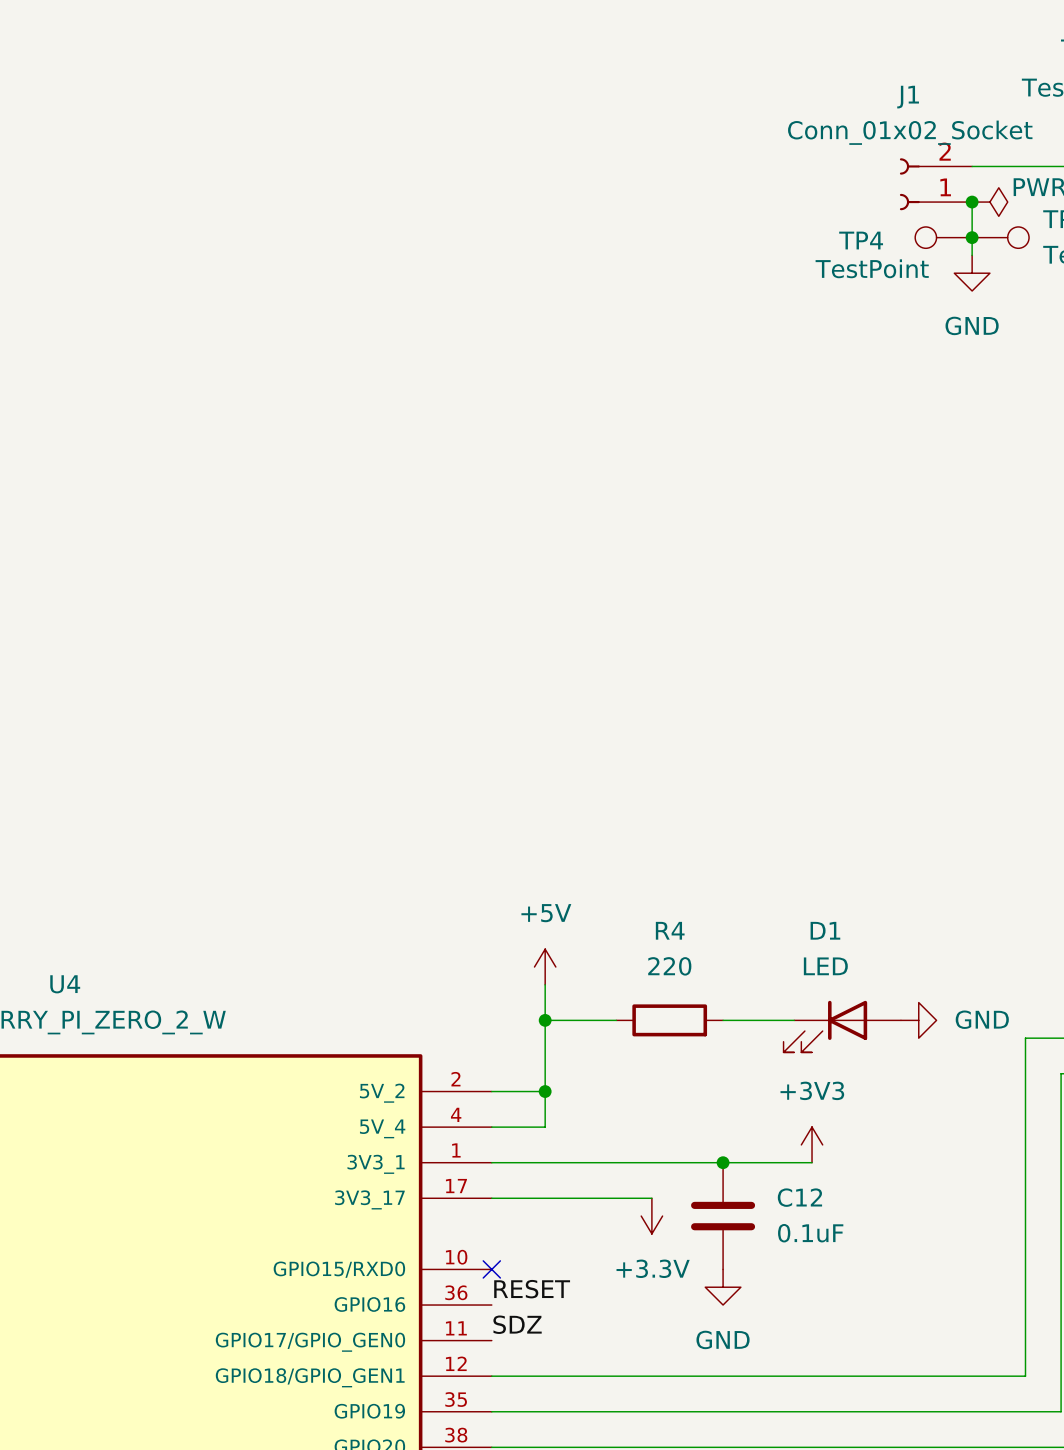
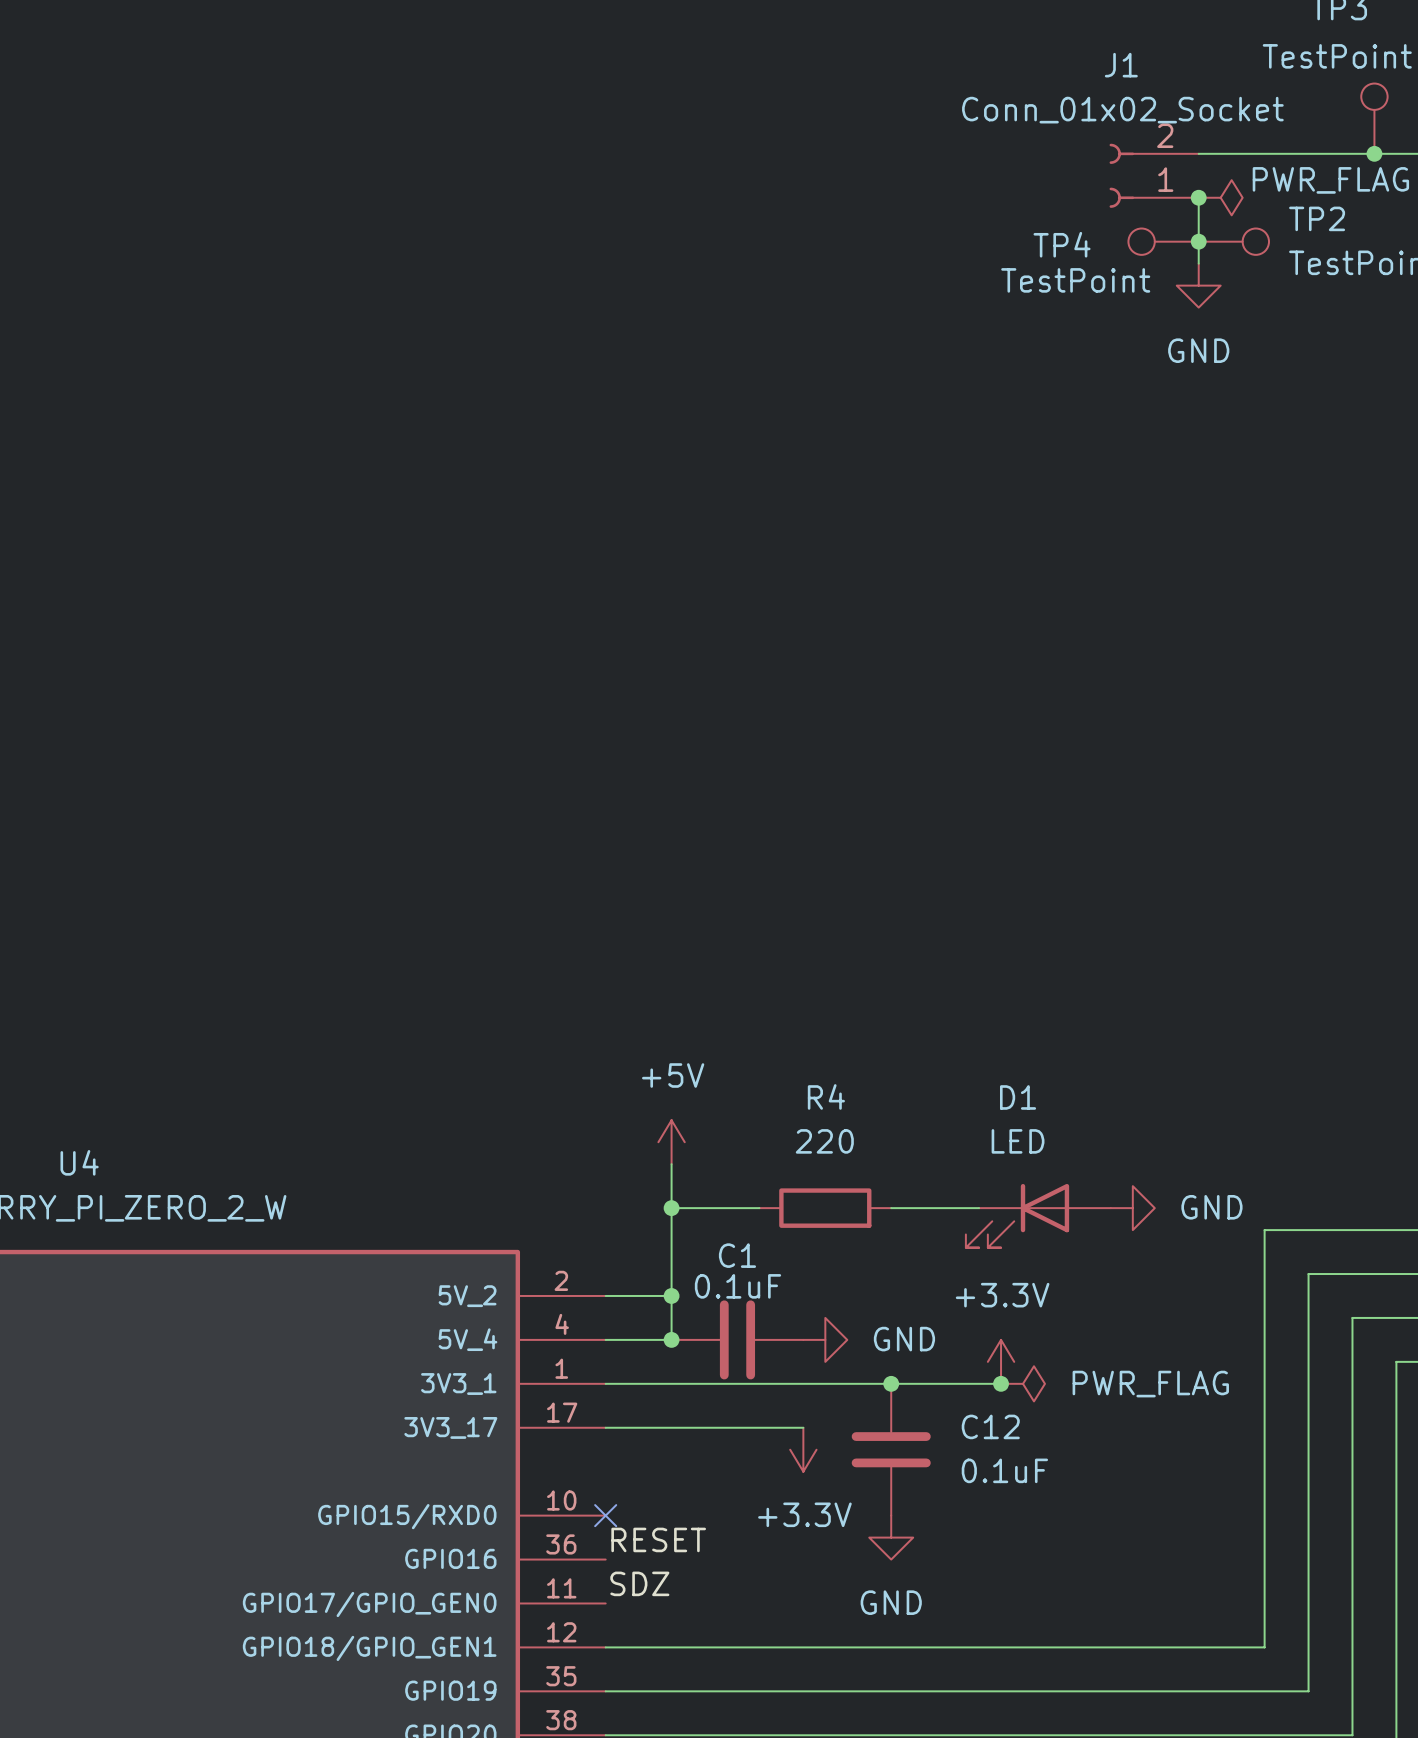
junction: none -> (671, 1339)
C1: none -> 0.1uF (737, 1339)
power symbol: none -> GND (825, 1339)
power symbol: +3V3 (812, 1144) -> +3.3V (1001, 1361)
junction: none -> (1001, 1383)
power symbol: none -> PWR_FLAG (1023, 1383)

